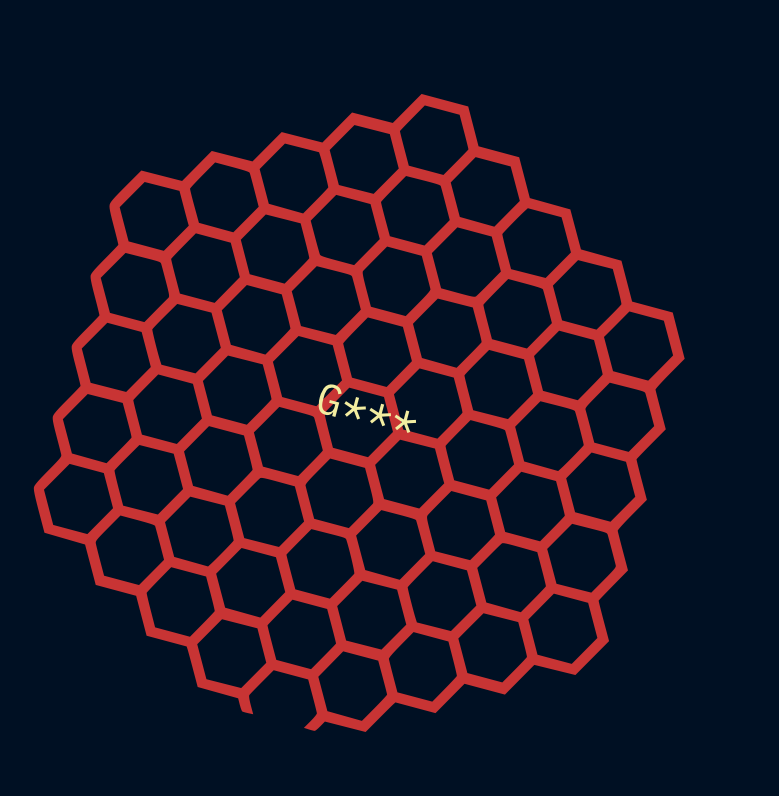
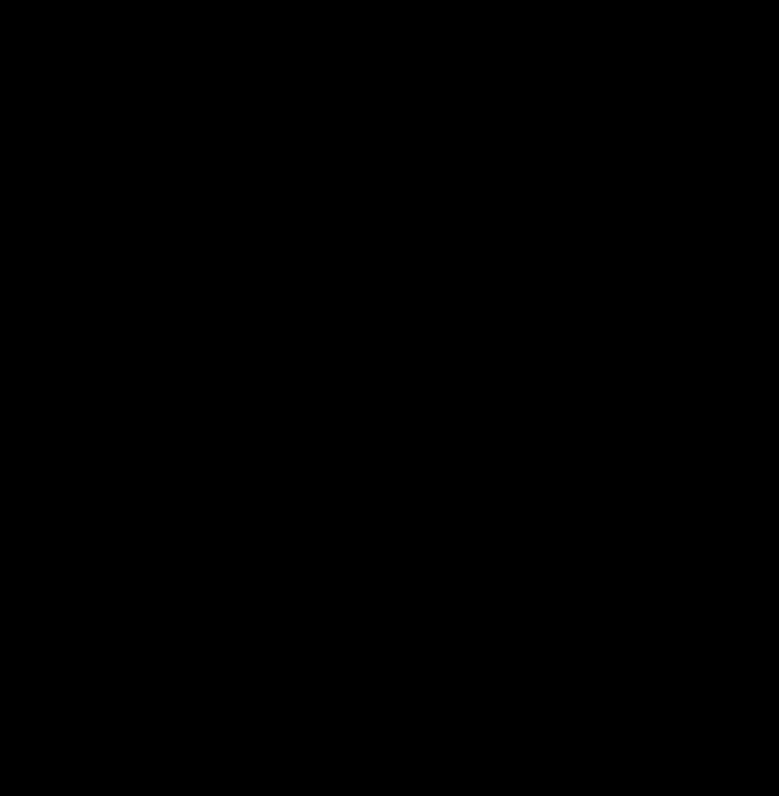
G***: (359, 412) -> none

